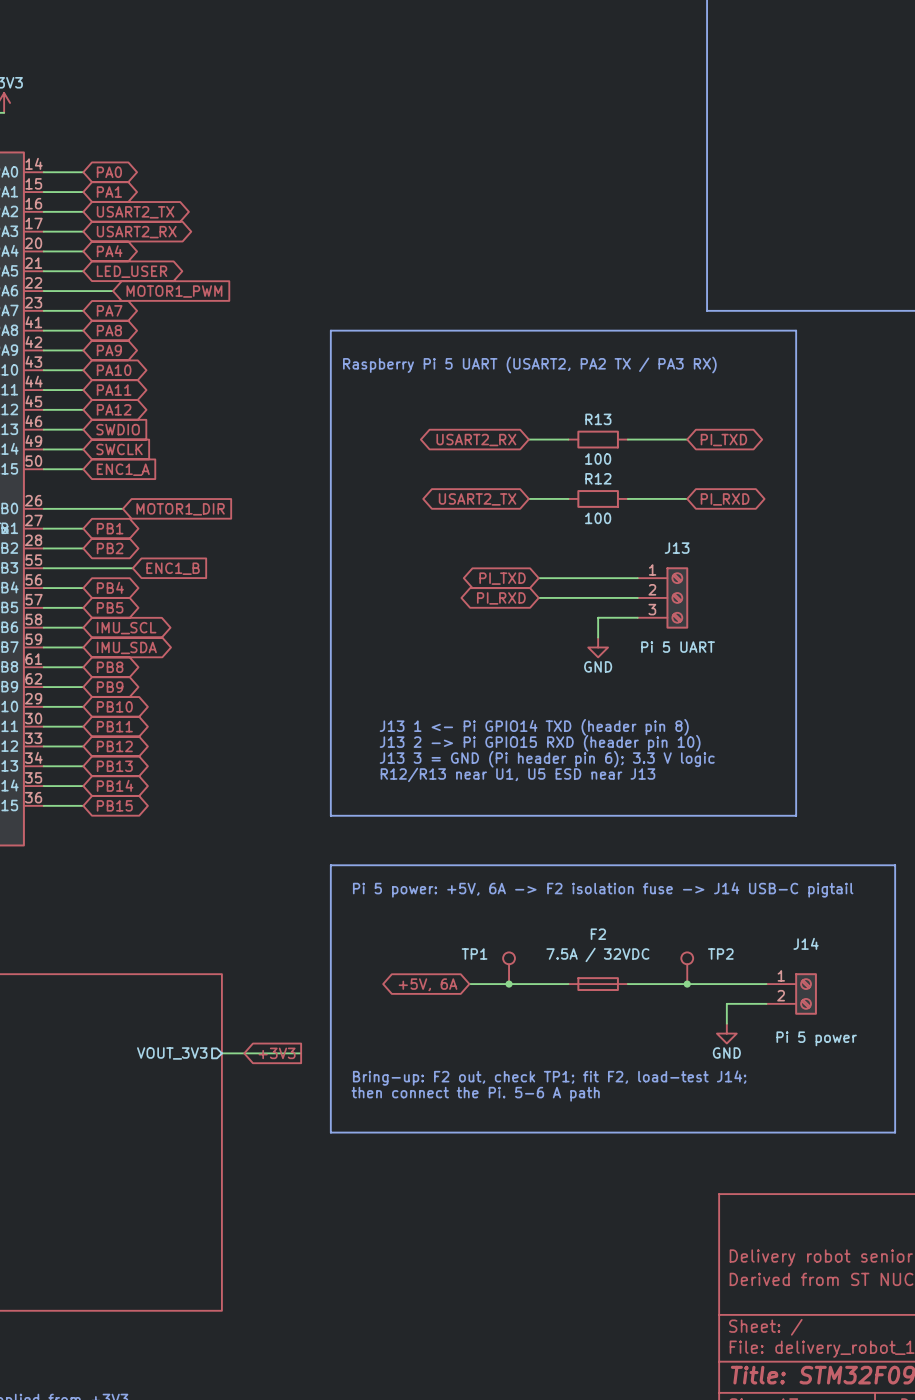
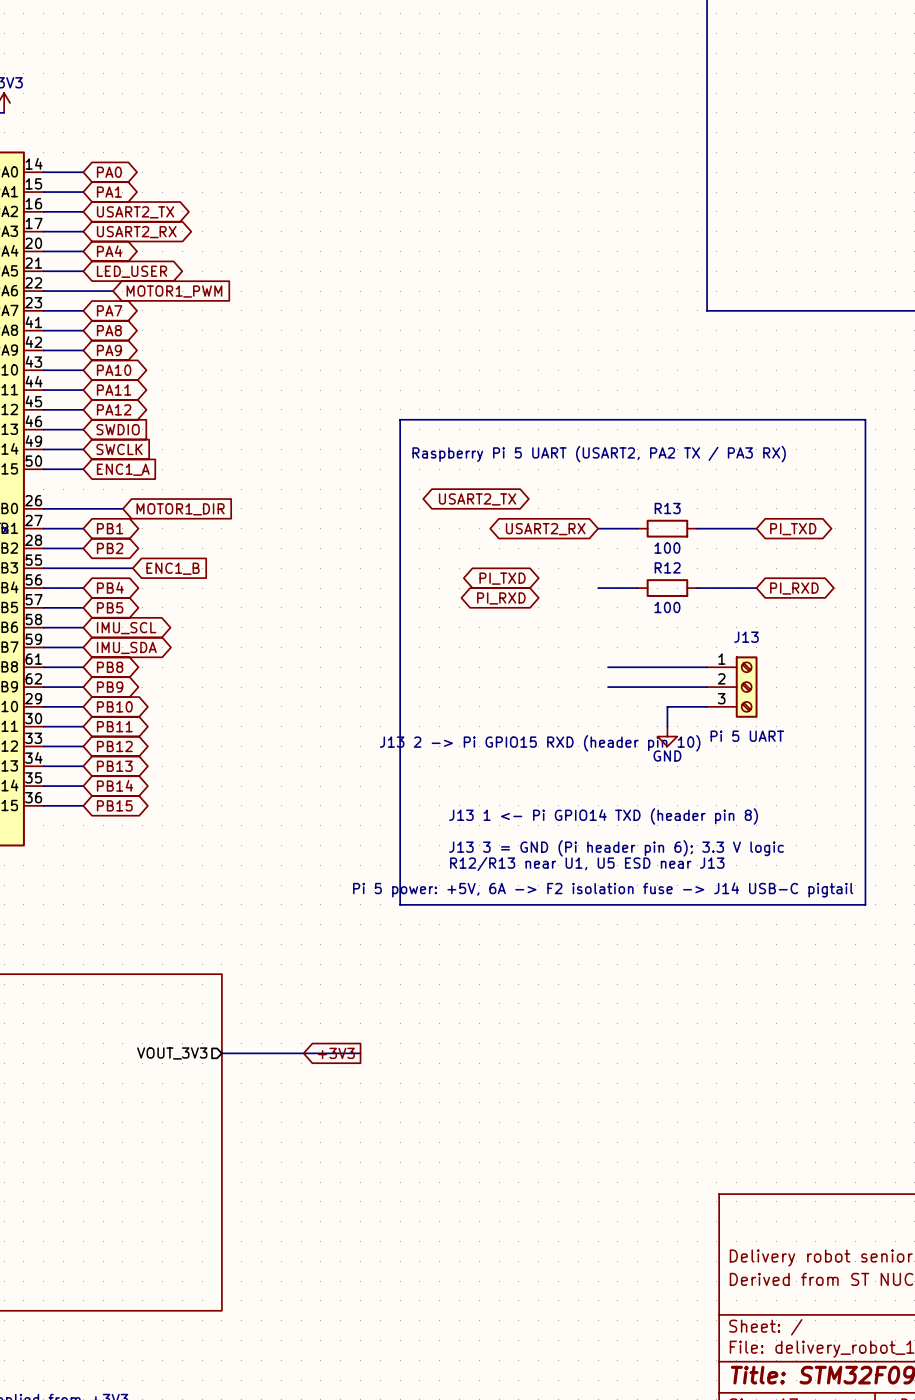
line: (330, 330) (796, 330) (796, 815) (330, 815) (330, 330) -> (400, 419) (865, 419) (865, 904) (400, 904) (400, 419)
text position: Raspberry Pi 5 UART (USART2, PA2 TX / PA3 RX) (529, 365) -> Raspberry Pi 5 UART (USART2, PA2 TX / PA3 RX) (599, 454)
wire: (528, 439) (568, 439) -> (598, 528) (637, 528)
R13 position: (598, 439) -> (667, 528)
wire: (627, 439) (687, 439) -> (697, 528) (756, 528)
global label position: USART2_RX (476, 440) -> USART2_RX (545, 529)
global label position: PI_TXD (723, 440) -> PI_TXD (793, 529)
wire: (528, 498) (568, 498) -> (598, 588) (637, 588)
R12 position: (598, 498) -> (667, 588)
wire: (627, 498) (687, 498) -> (697, 588) (756, 588)
global label position: PI_RXD (725, 499) -> PI_RXD (794, 588)
wire: (538, 578) (637, 578) -> (608, 667) (707, 667)
wire: (538, 597) (637, 597) -> (608, 687) (707, 687)
J13 position: (662, 597) -> (732, 687)
wire: (637, 617) (598, 617) (598, 637) -> (707, 706) (667, 706) (667, 726)
power symbol position: GND (598, 647) -> GND (667, 736)
text position: J13 1 <- Pi GPIO14 TXD (header pin 8) (534, 727) -> J13 1 <- Pi GPIO14 TXD (header pin 8) (603, 816)
text position: J13 3 = GND (Pi header pin 6); 3.3 V logic (547, 759) -> J13 3 = GND (Pi header pin 6); 3.3 V logic (616, 848)
text position: R12/R13 near U1, U5 ESD near J13 (517, 774) -> R12/R13 near U1, U5 ESD near J13 (587, 864)
line: (330, 865) (330, 1132) (895, 1132) (895, 865) (330, 865) -> none
TP1: (509, 968) -> none
TP2: (687, 968) -> none
global label: +5V, 6A (428, 984) -> none
wire: (469, 984) (568, 984) -> none
junction: (509, 984) -> none
F2: 7.5A / 32VDC (598, 984) -> none
wire: (627, 984) (766, 984) -> none
junction: (687, 984) -> none
J14: Pi 5 power (791, 993) -> none
wire: (766, 1003) (726, 1003) (726, 1023) -> none
power symbol: GND (726, 1033) -> none
global label position: +3V3 (277, 1053) -> +3V3 (336, 1053)
wire: none -> (301, 1053) (360, 1053)
text: Bring-up: F2 out, check TP1; fit F2, load-test J14; (549, 1078) -> none
text: then connect the Pi. 5-6 A path (475, 1094) -> none

